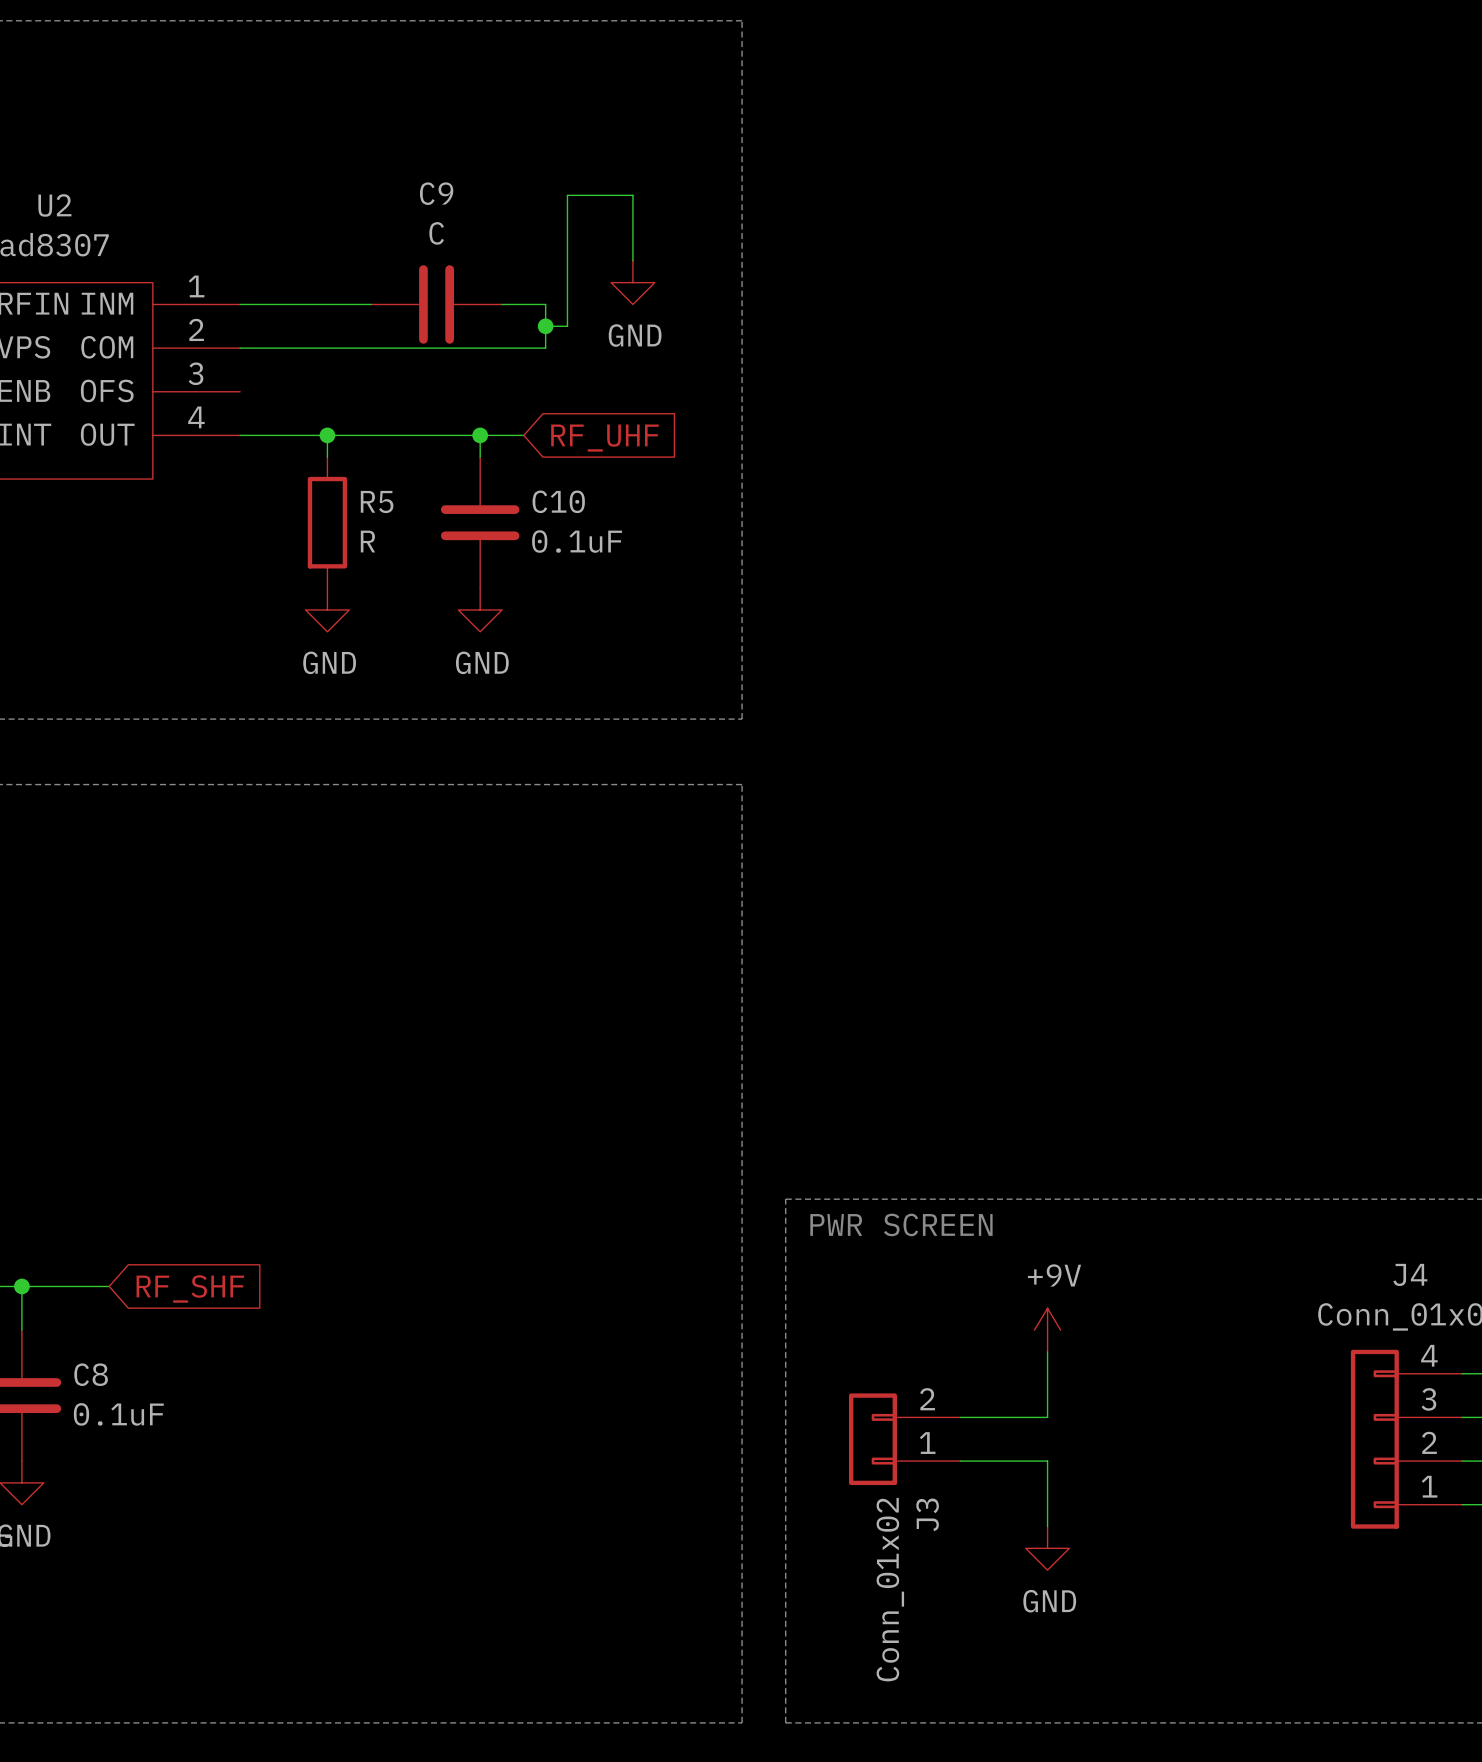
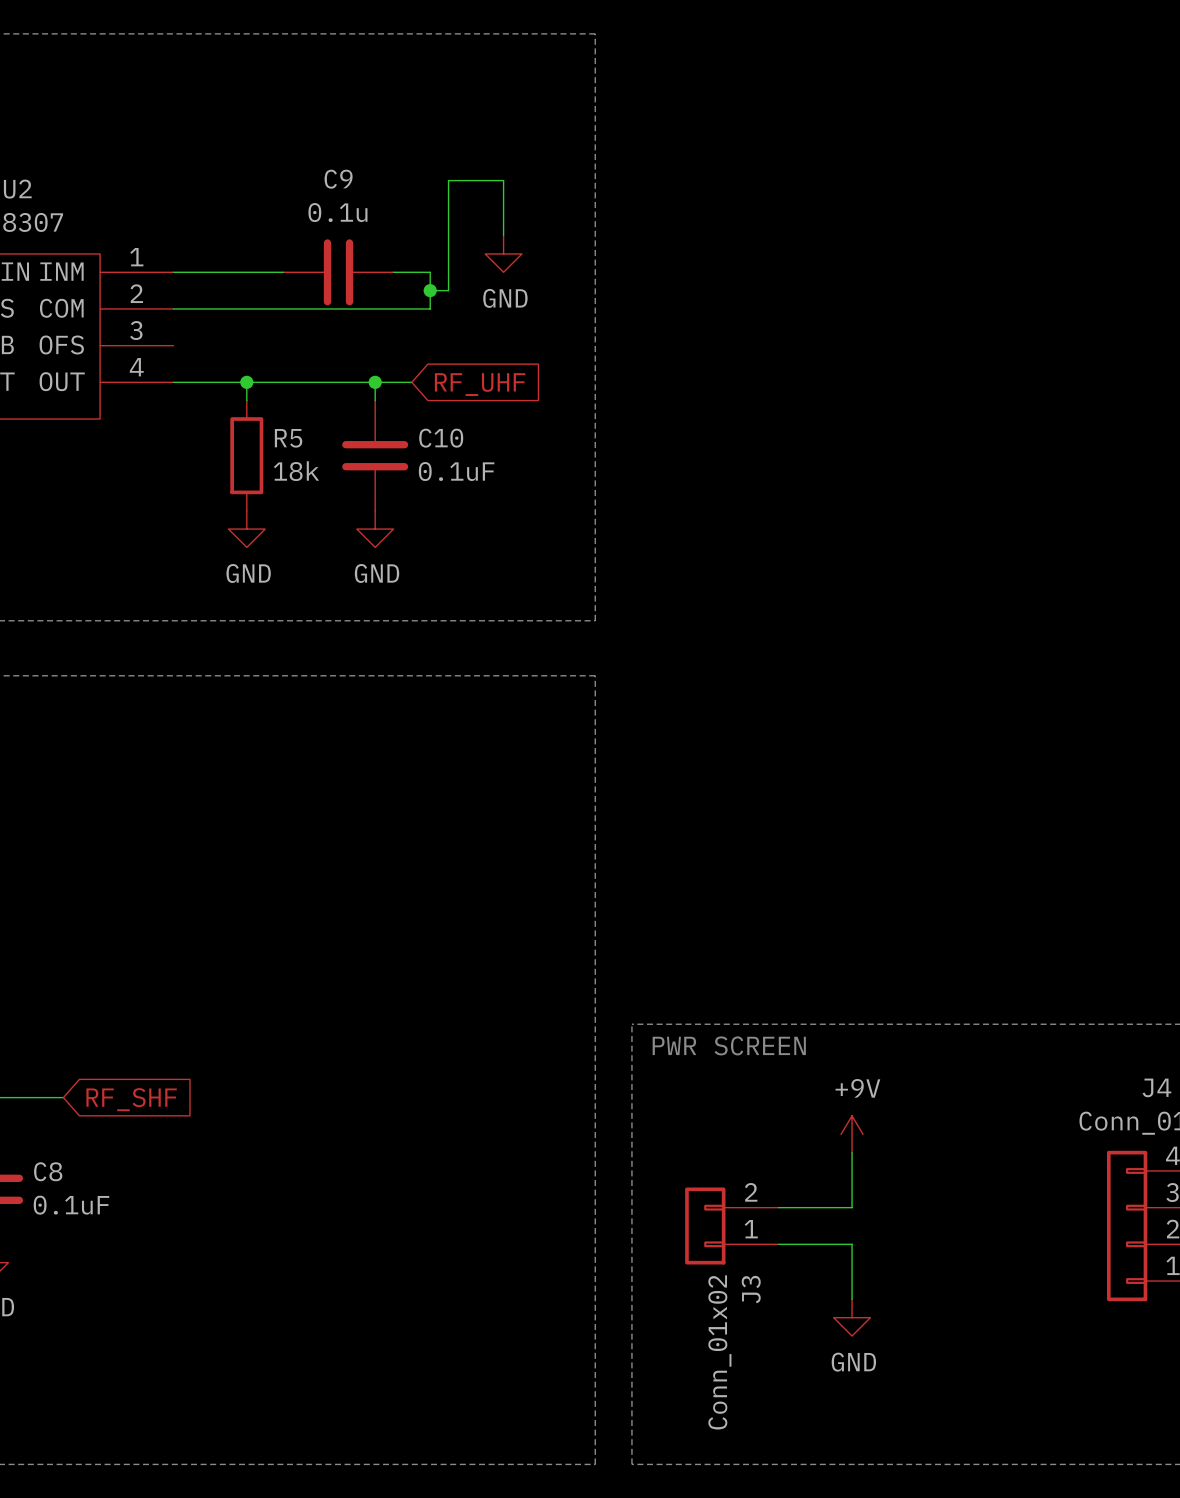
C9 value: C (436, 233) -> 0.1u (337, 212)
R5 value: R (367, 541) -> 18k (296, 471)

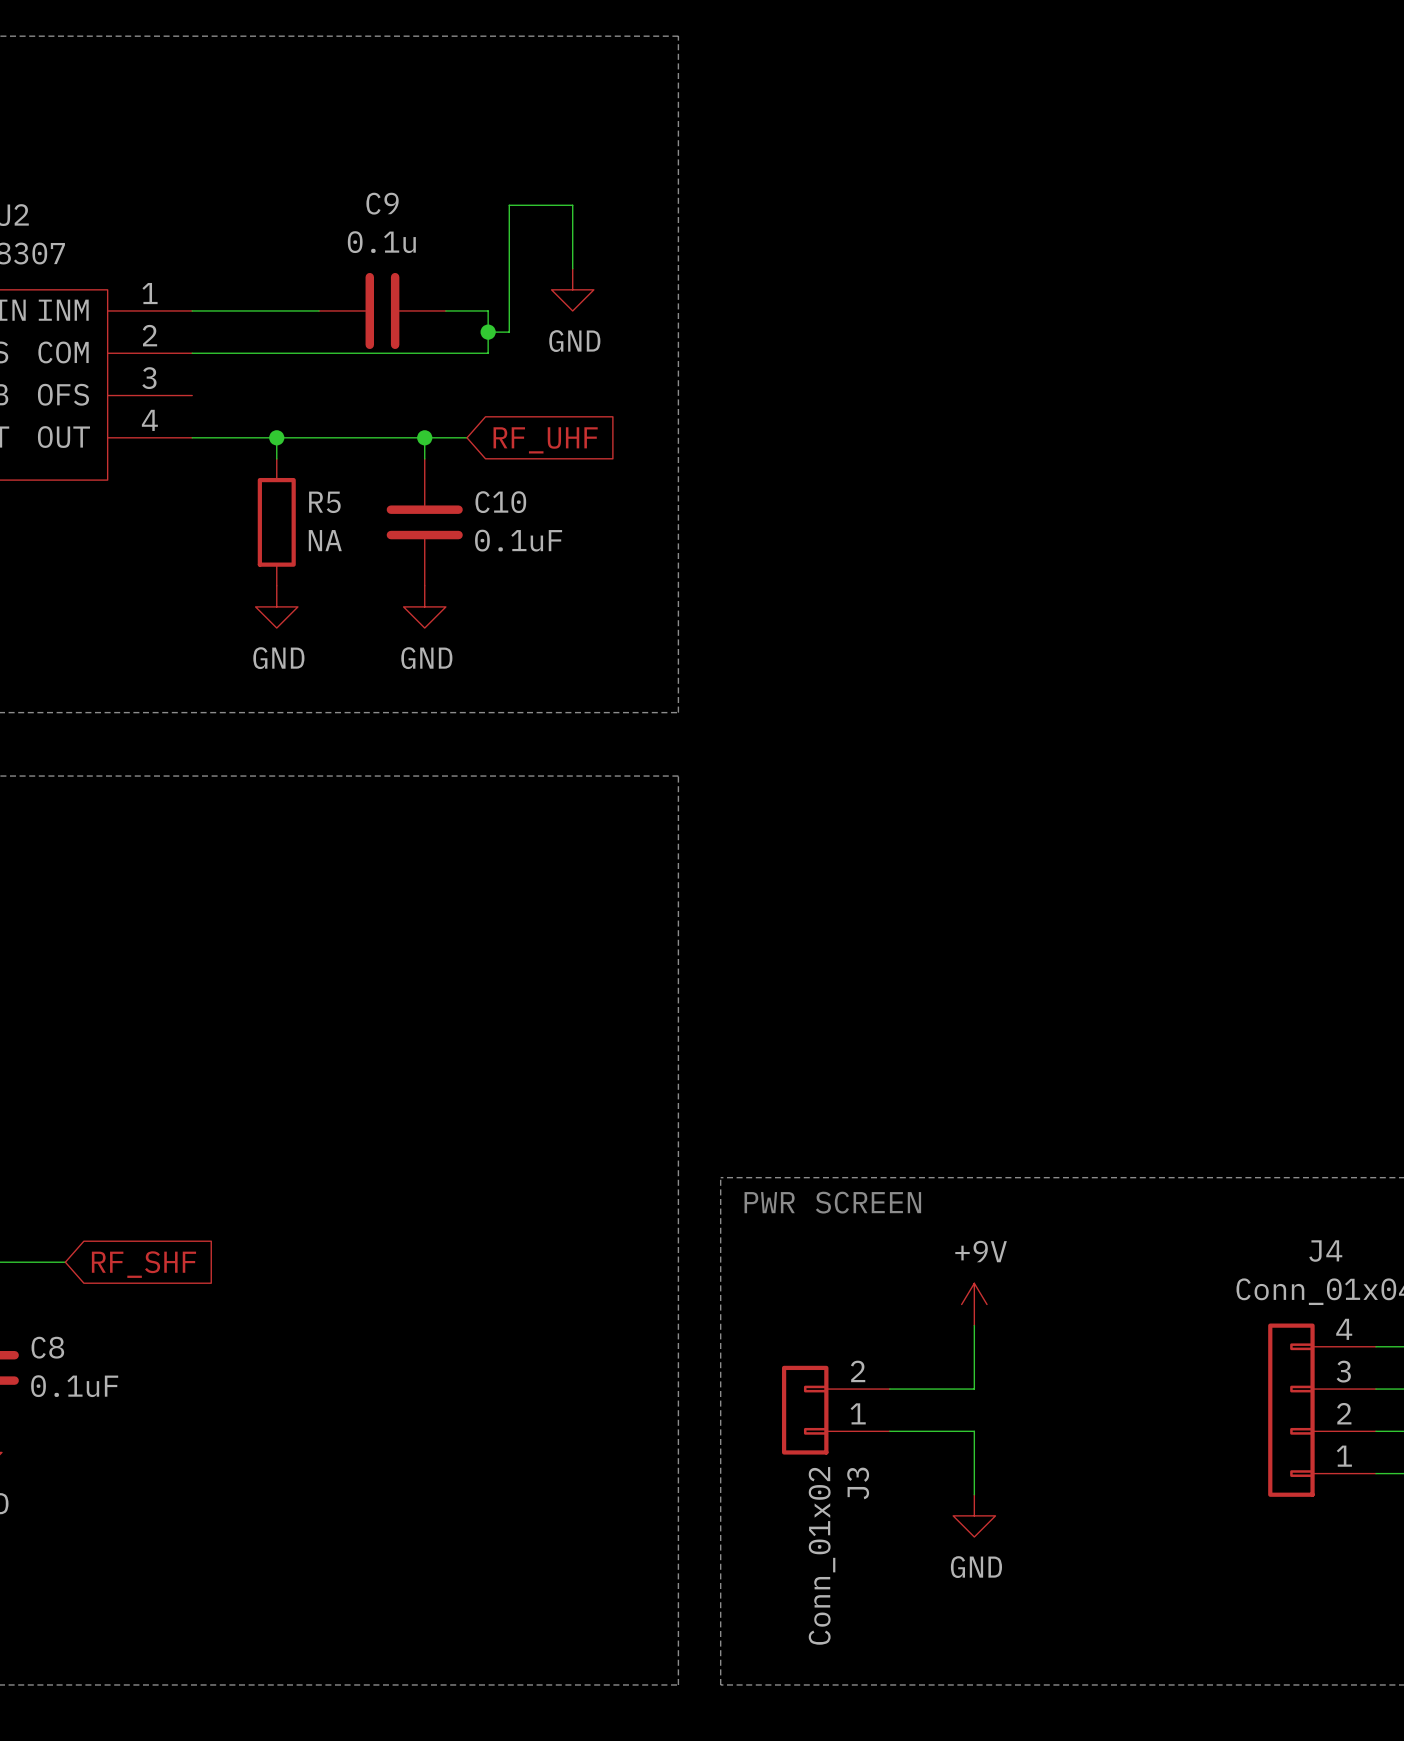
R5 value: 18k (296, 471) -> NA (325, 540)

